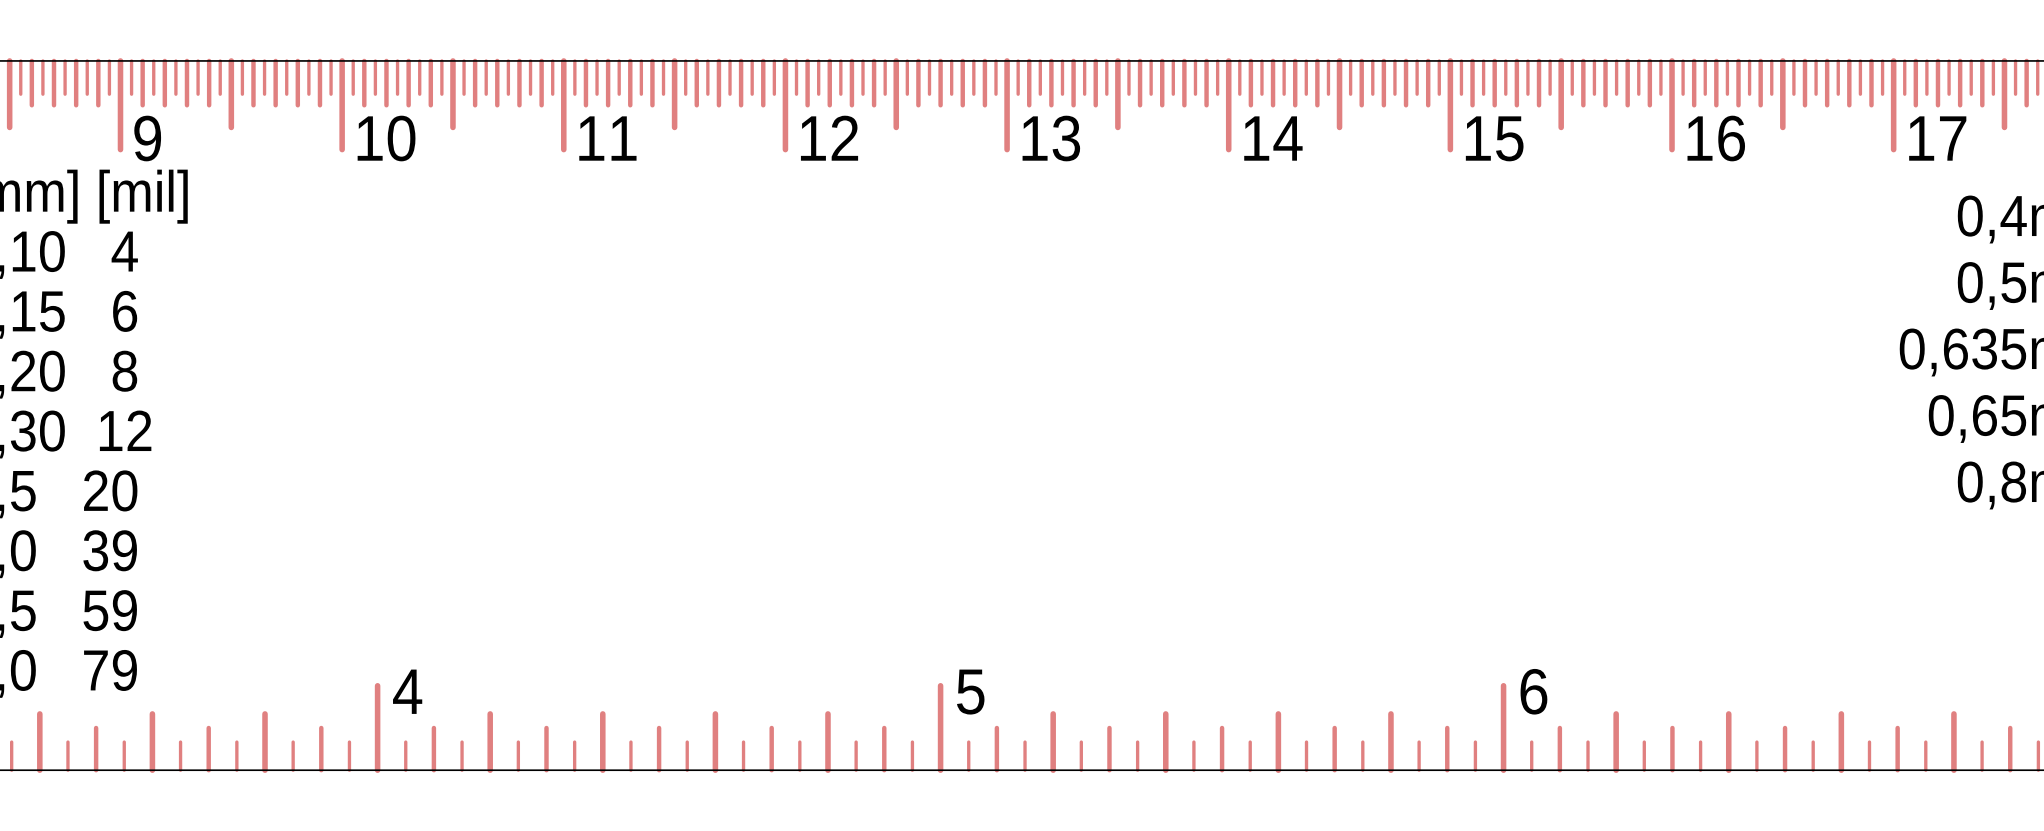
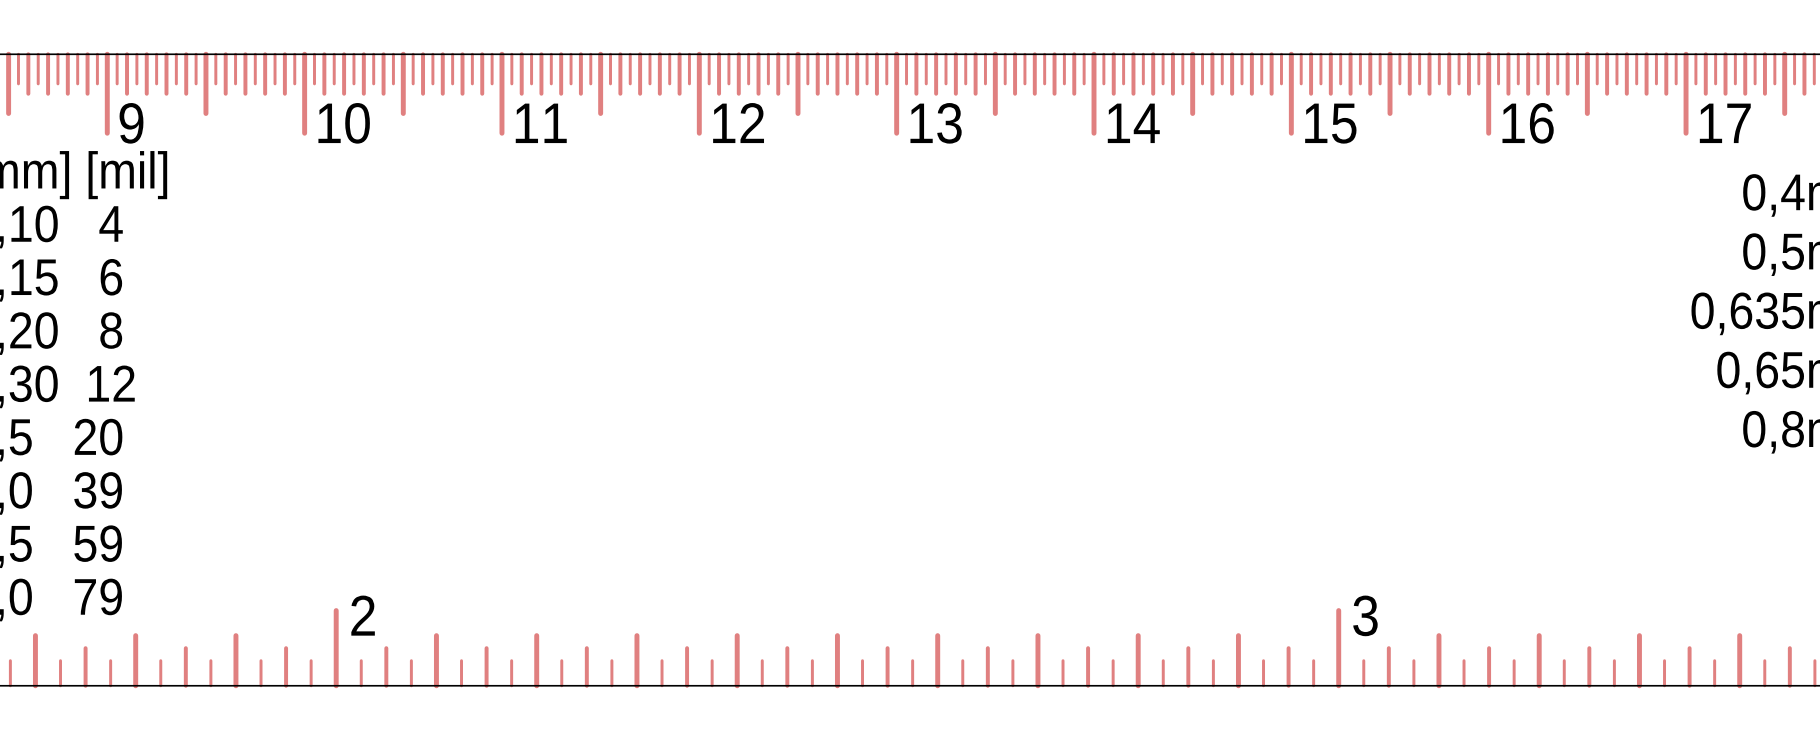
track: (940, 685) (940, 713) -> none
text: 4 (407, 691) -> 2 (363, 615)
text: 6 (1533, 691) -> 3 (1365, 615)
text: 5 (970, 692) -> none

